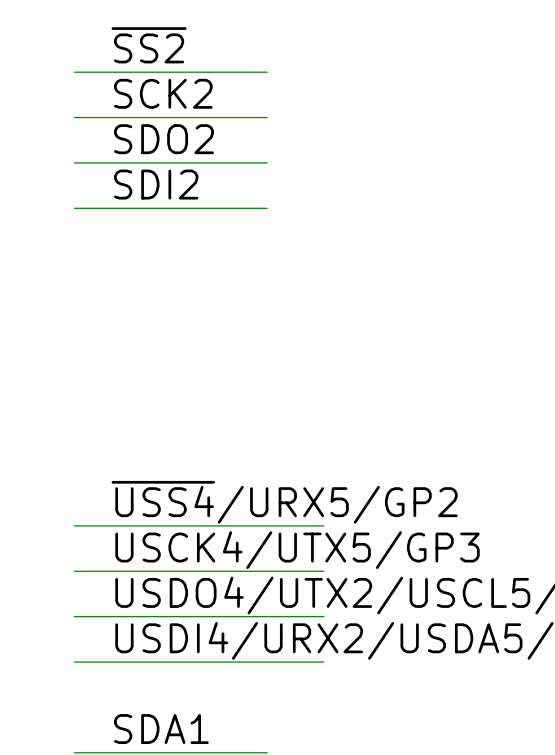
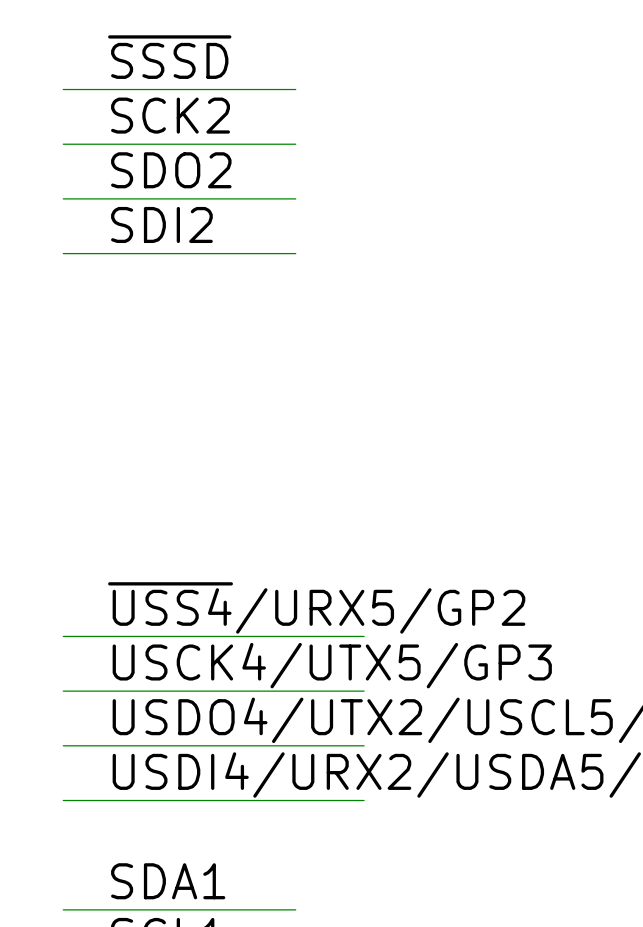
label: ~{SS2} (149, 45) -> ~{SSSD} (169, 57)

